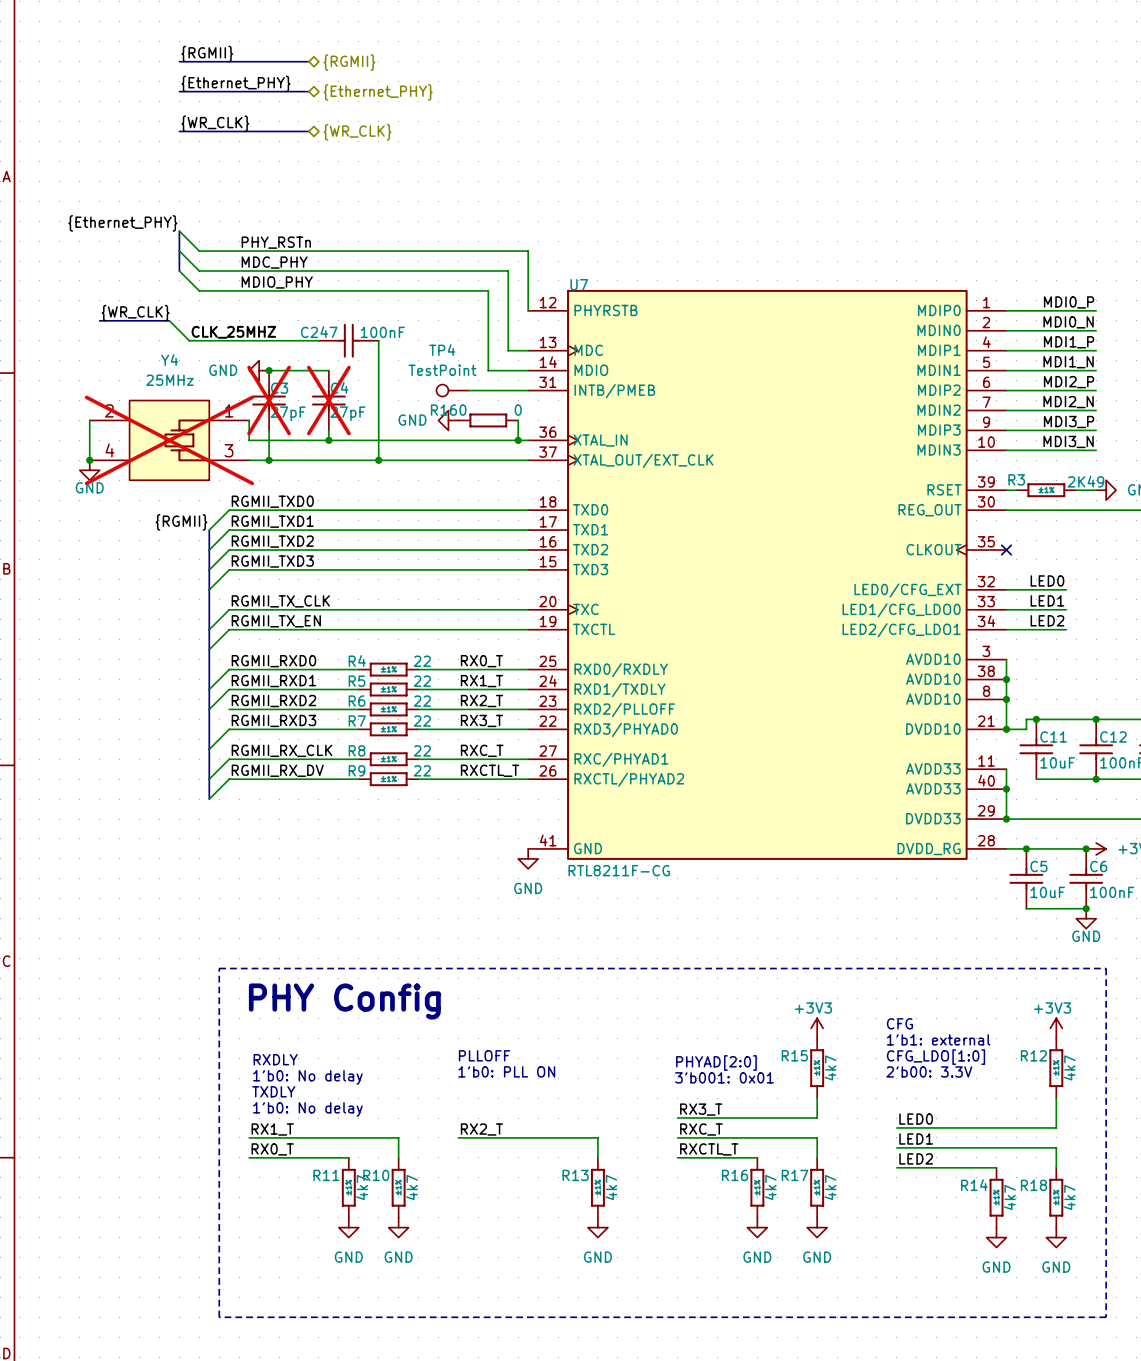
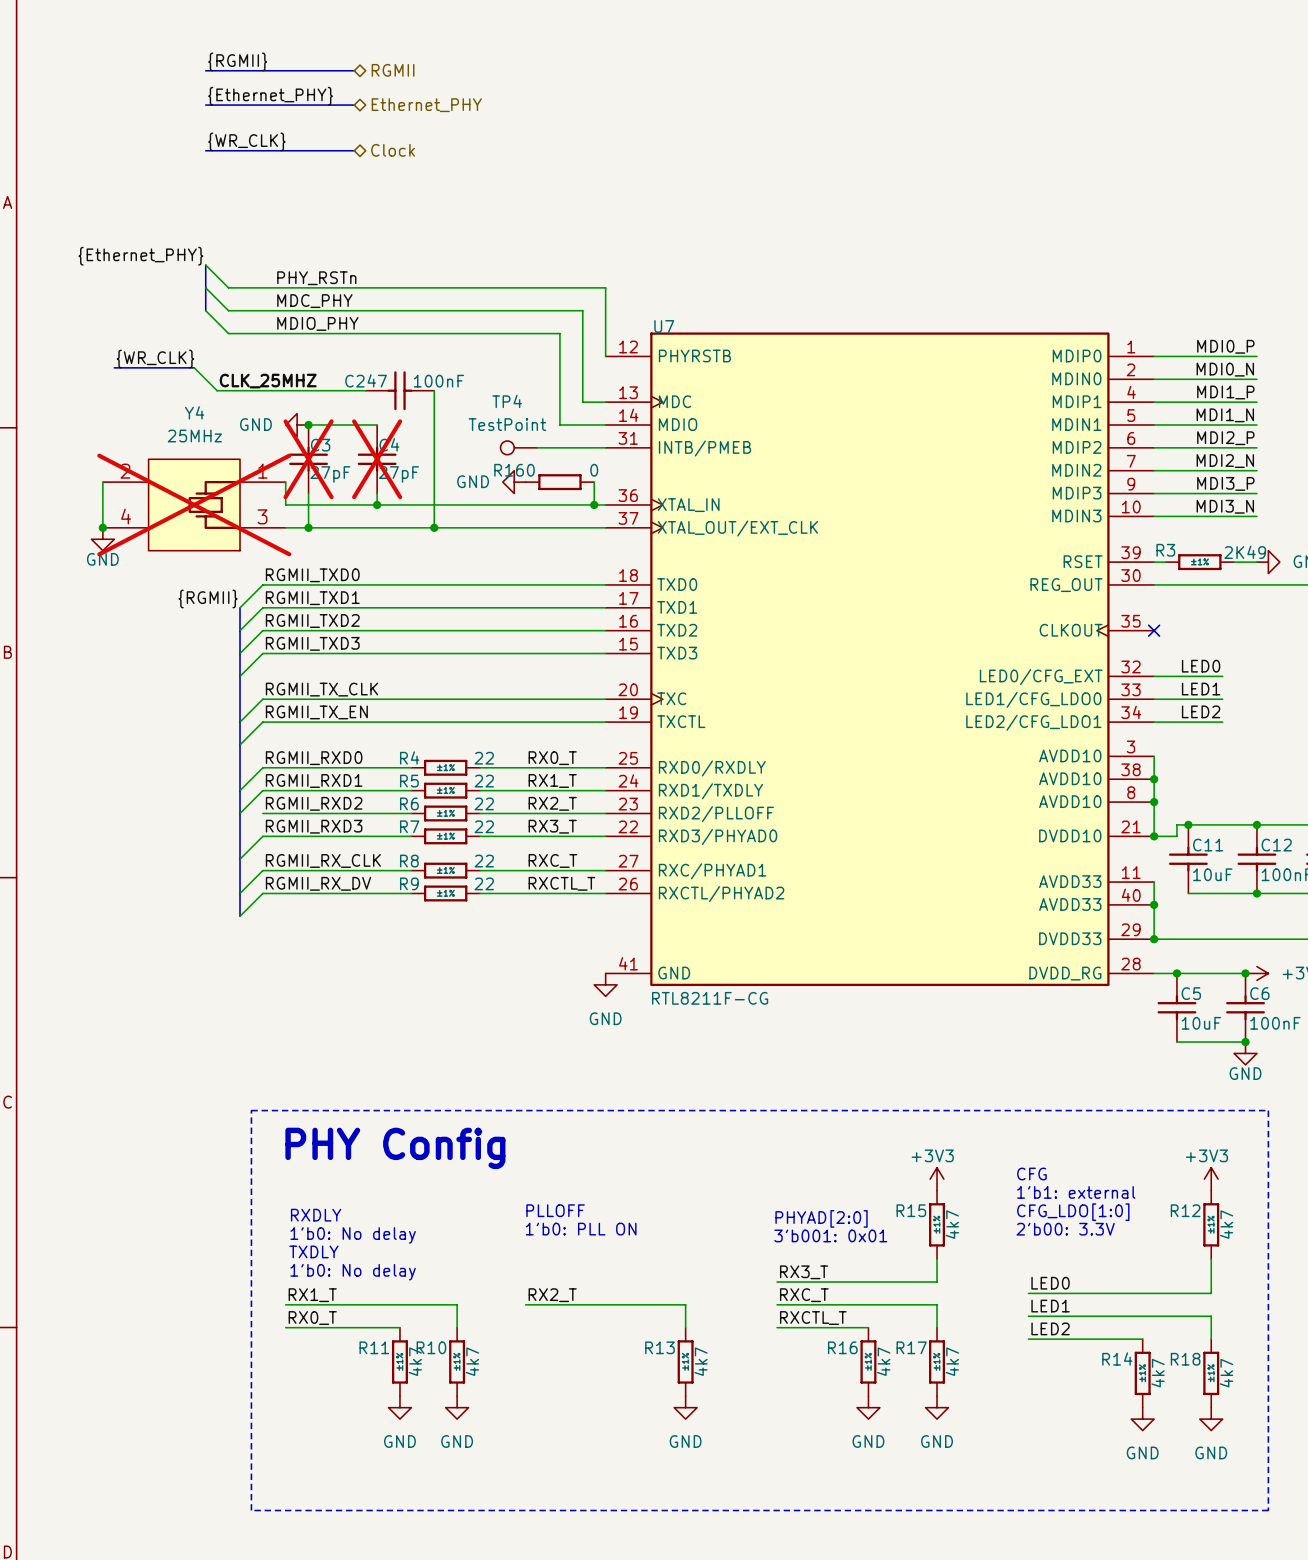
hierarchical label: {RGMII} (349, 62) -> RGMII (393, 70)
hierarchical label: {Ethernet_PHY} (378, 92) -> Ethernet_PHY (426, 105)
hierarchical label: {WR_CLK} (357, 132) -> Clock (393, 150)

